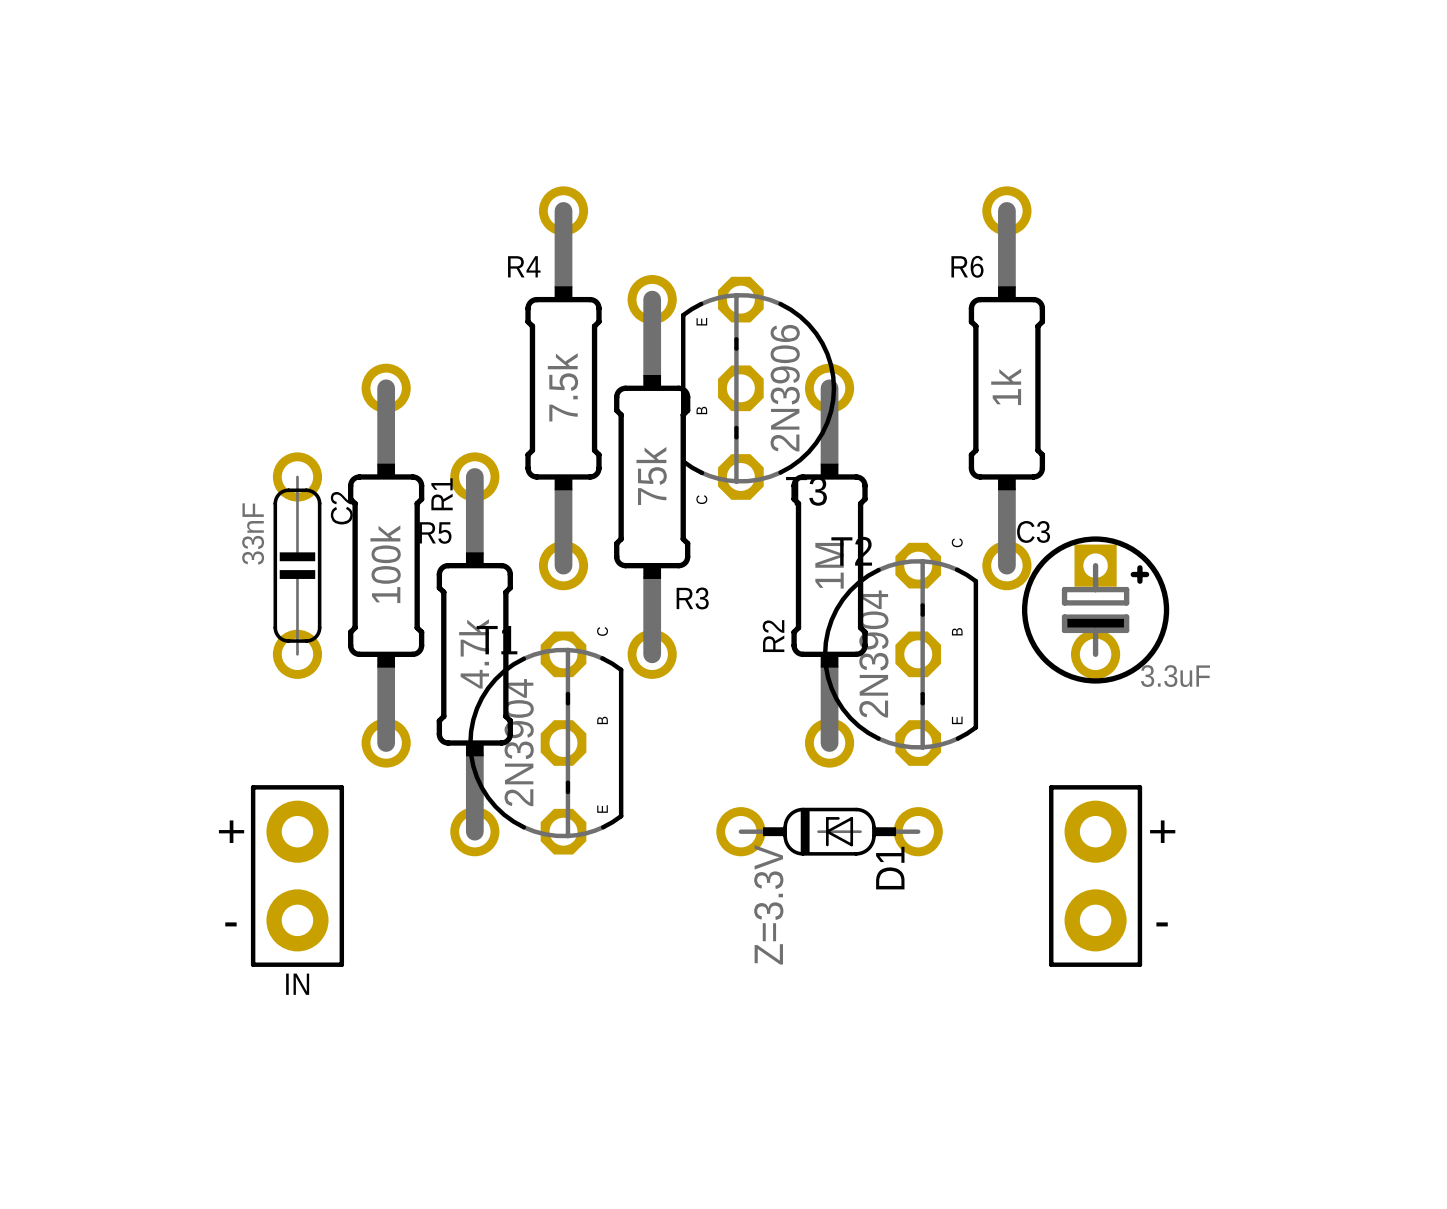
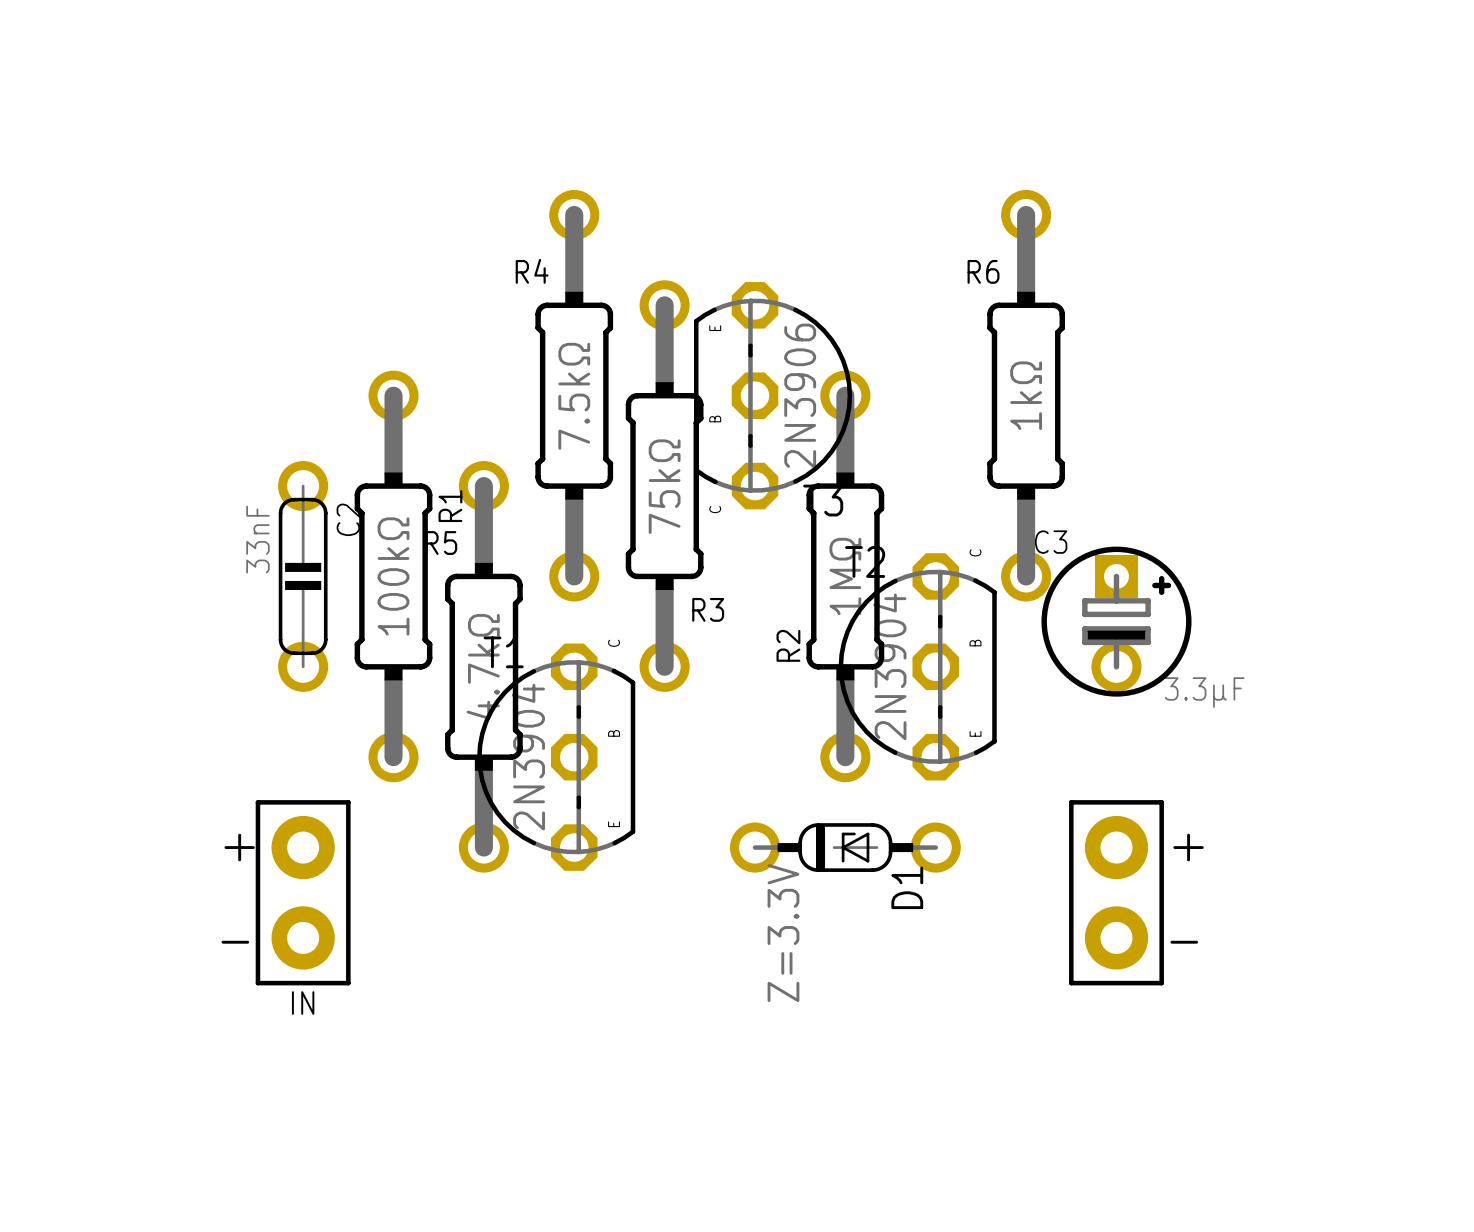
R6 value: 1k (1006, 386) -> 1kΩ (1026, 395)
R4 value: 7.5k (562, 387) -> 7.5kΩ (574, 396)
R3 value: 75k (651, 475) -> 75kΩ (664, 486)
R1 value: 100k (385, 564) -> 100kΩ (393, 576)
R2 value: 1M (829, 565) -> 1MΩ (845, 576)
R5 value: 4.7k (474, 653) -> 4.7kΩ (483, 666)
C3 value: 3.3uF (1175, 676) -> 3.3μF (1204, 692)

